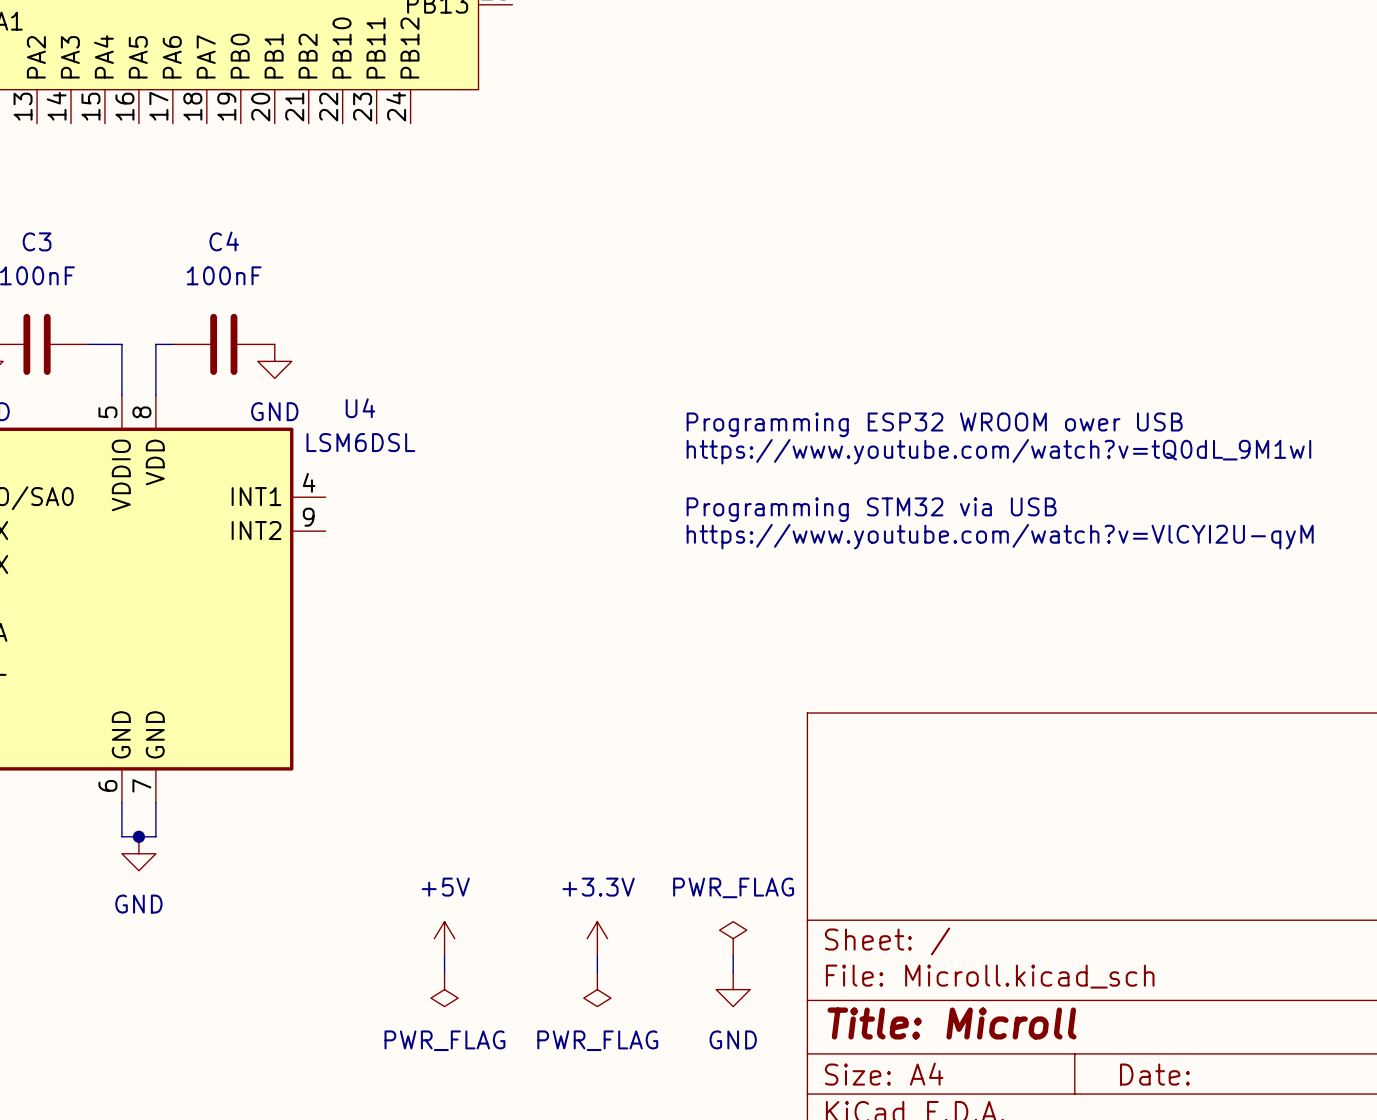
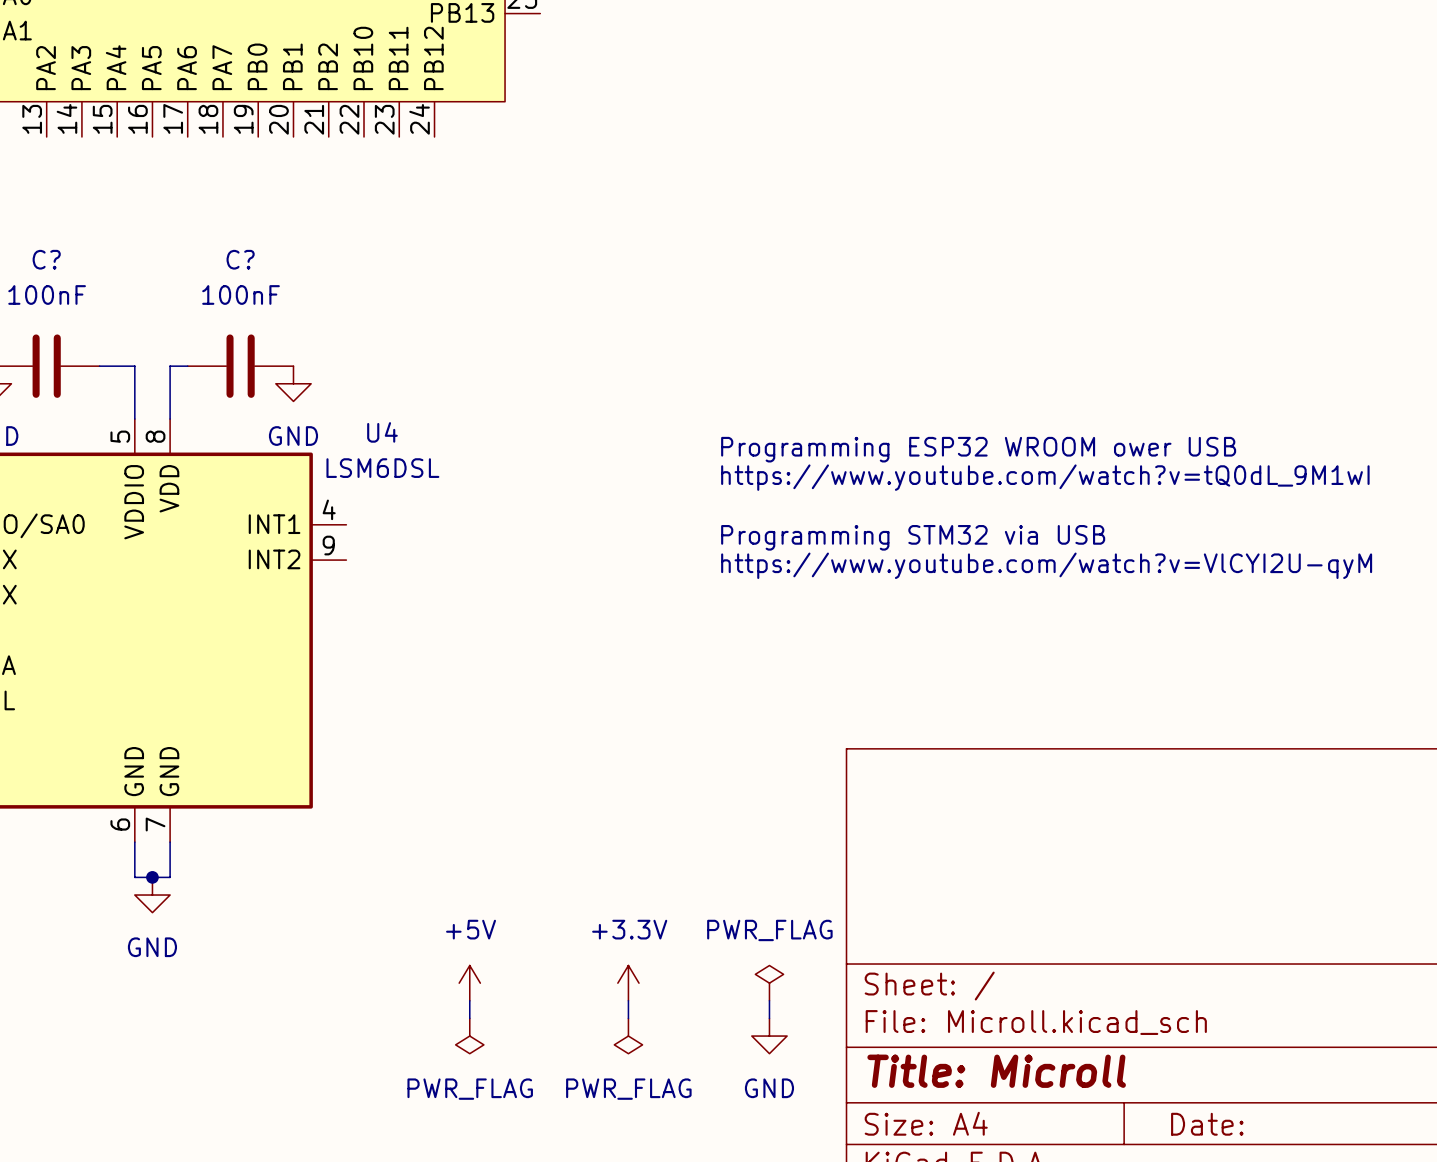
C3 name: C3 (37, 241) -> C? (46, 259)
C4 name: C4 (224, 241) -> C? (240, 259)

